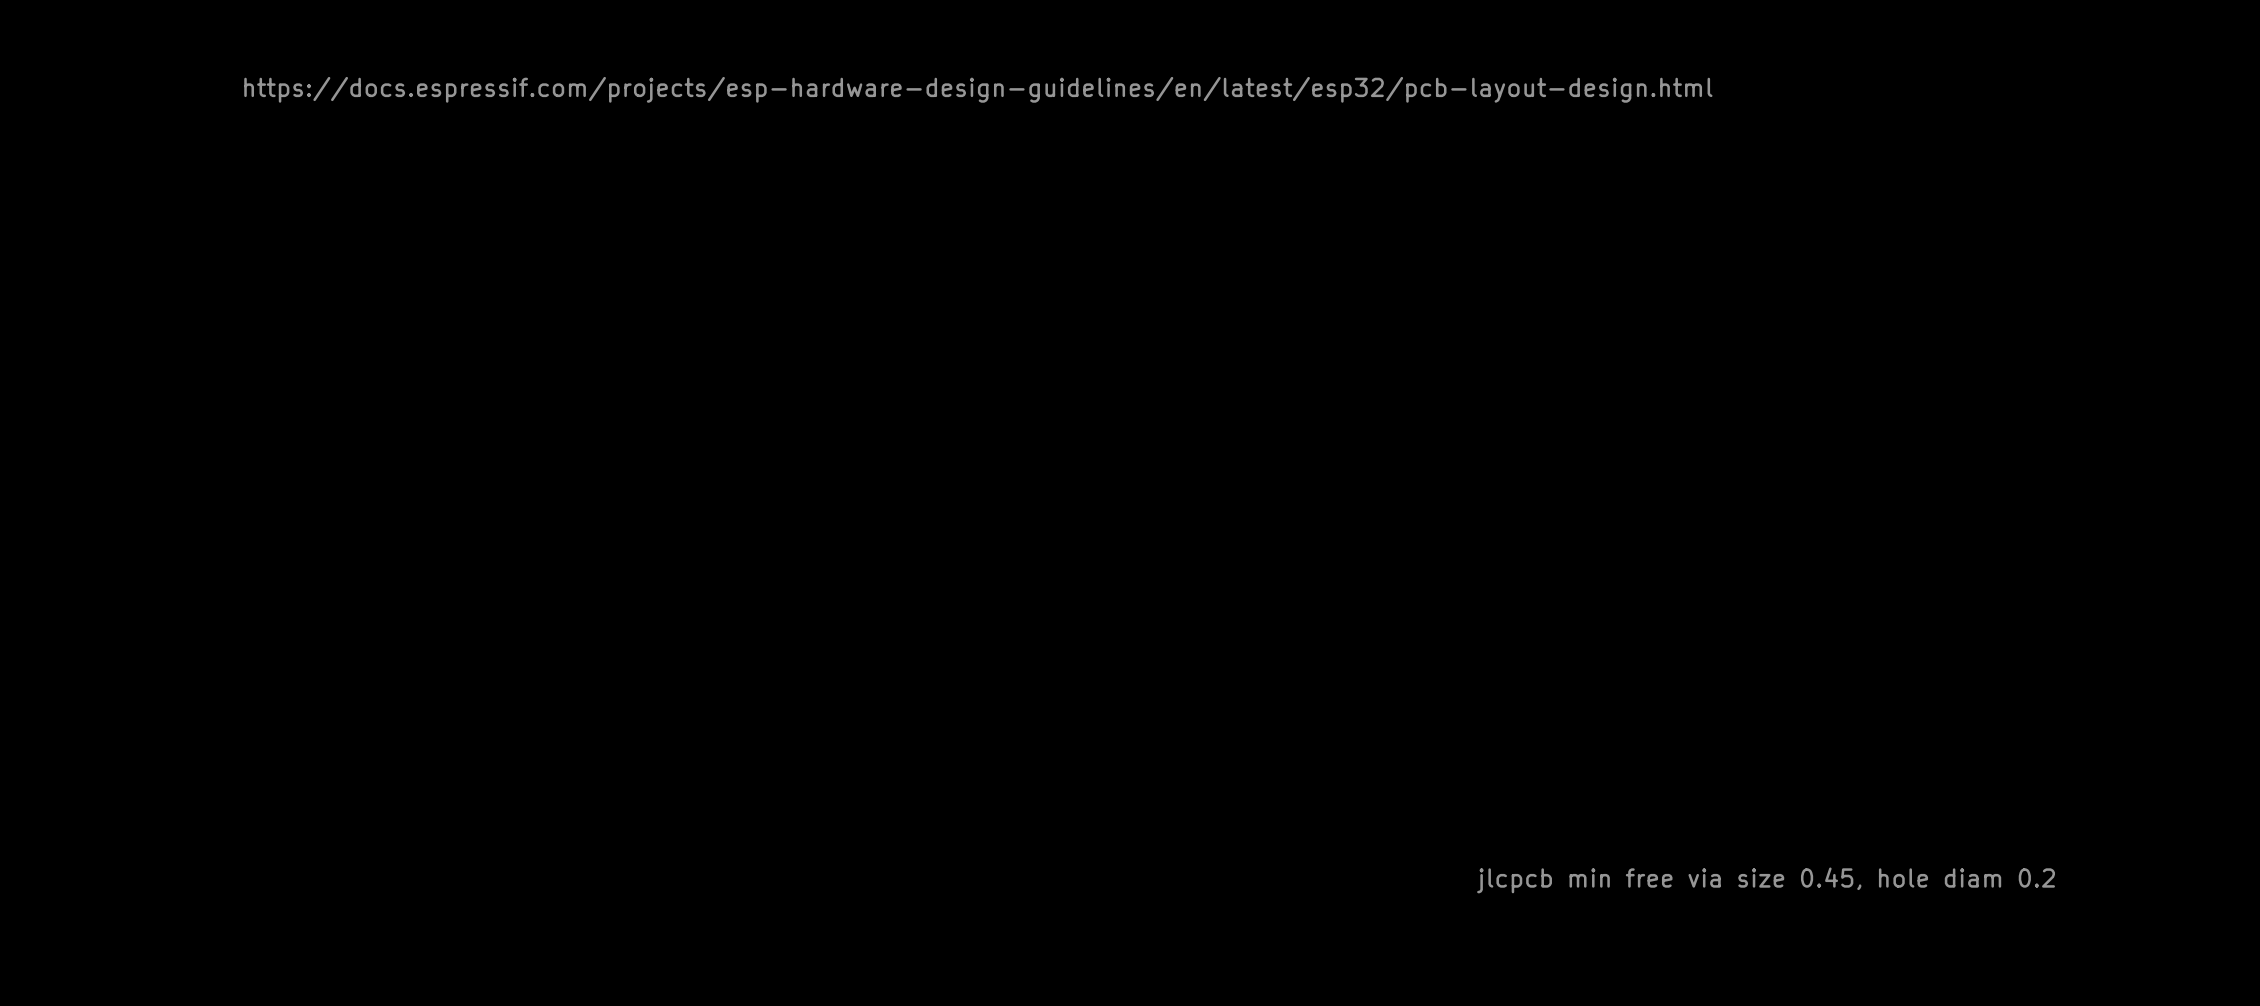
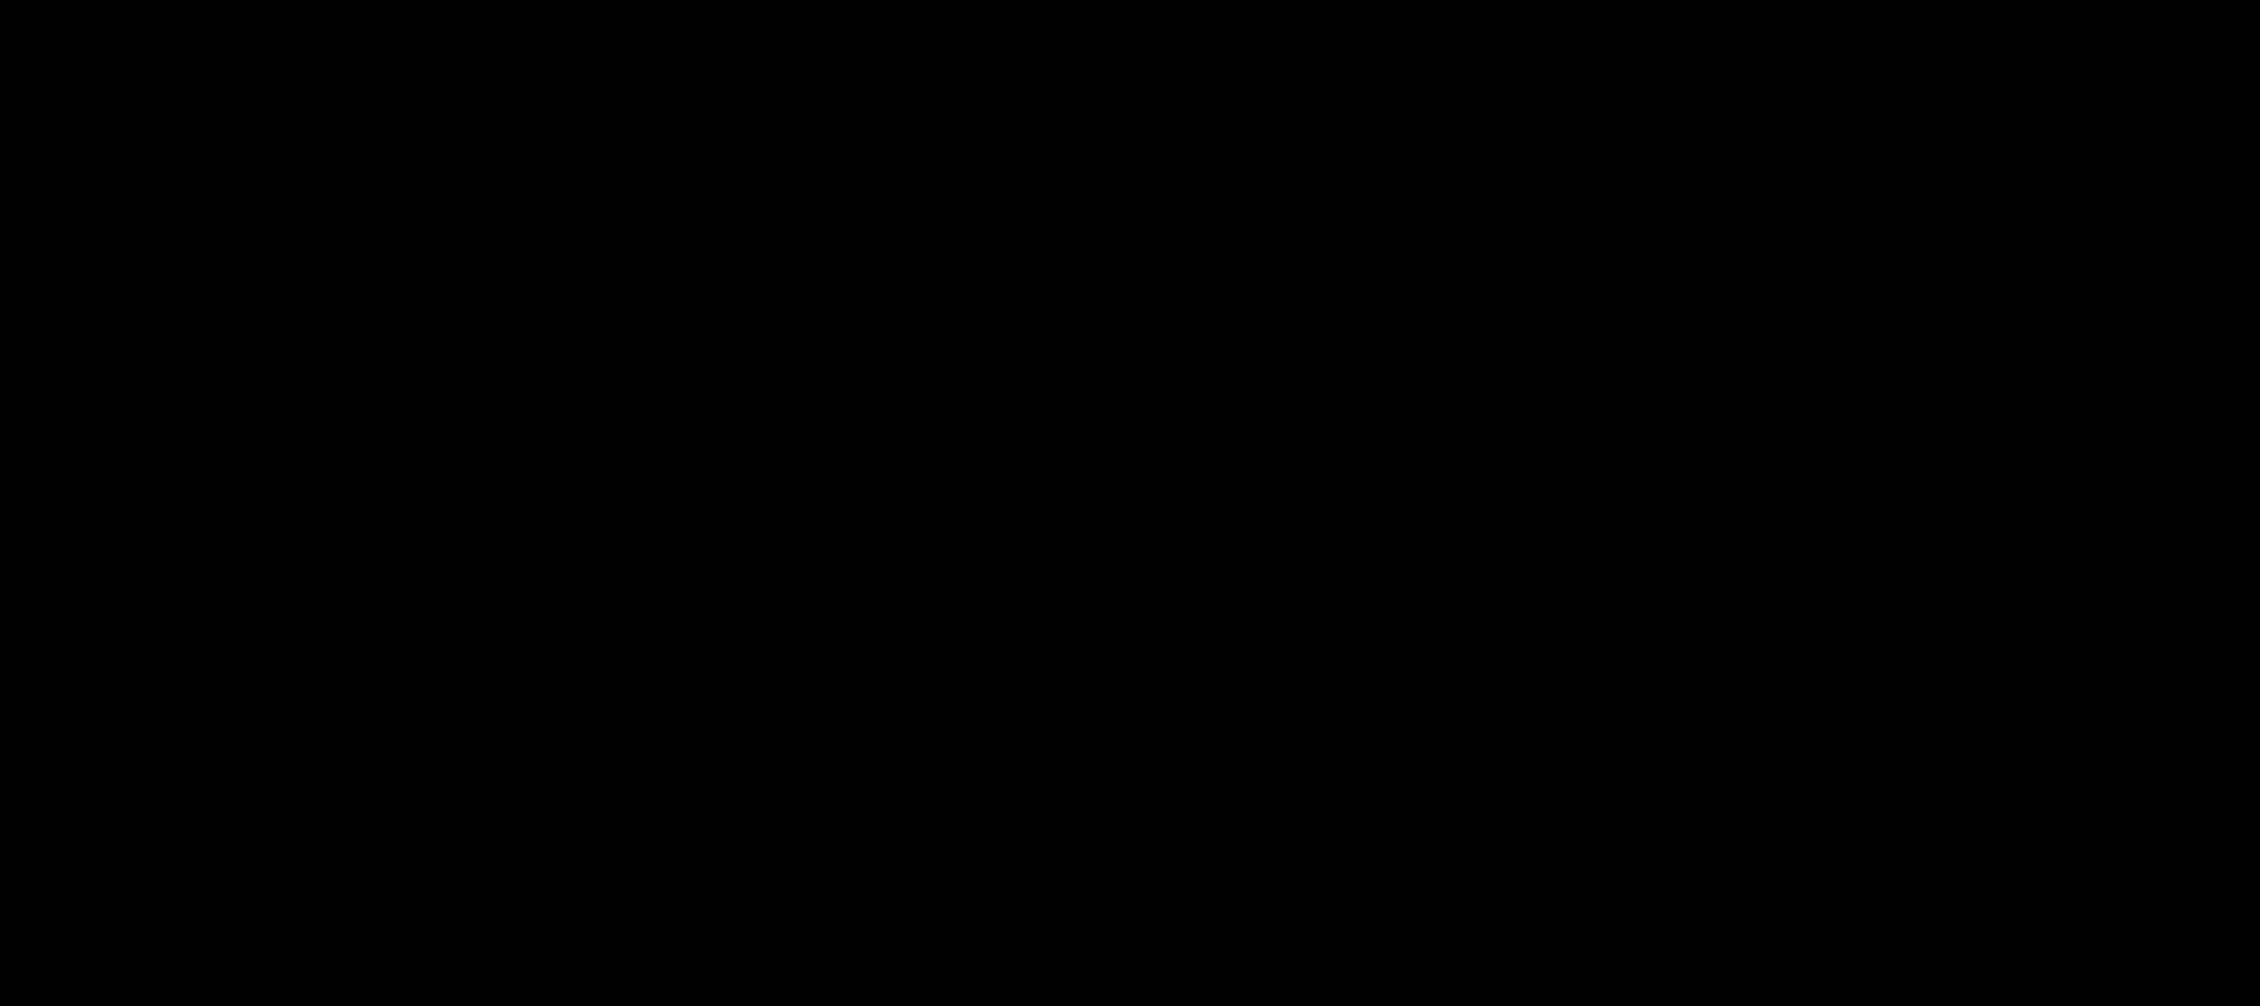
text: https://docs.espressif.com/projects/esp-hardware-design-guidelines/en/latest/esp32/pcb-layout-design.html (978, 89) -> none
text: jlcpcb min free via size 0.45, hole diam 0.2 (1766, 880) -> none

